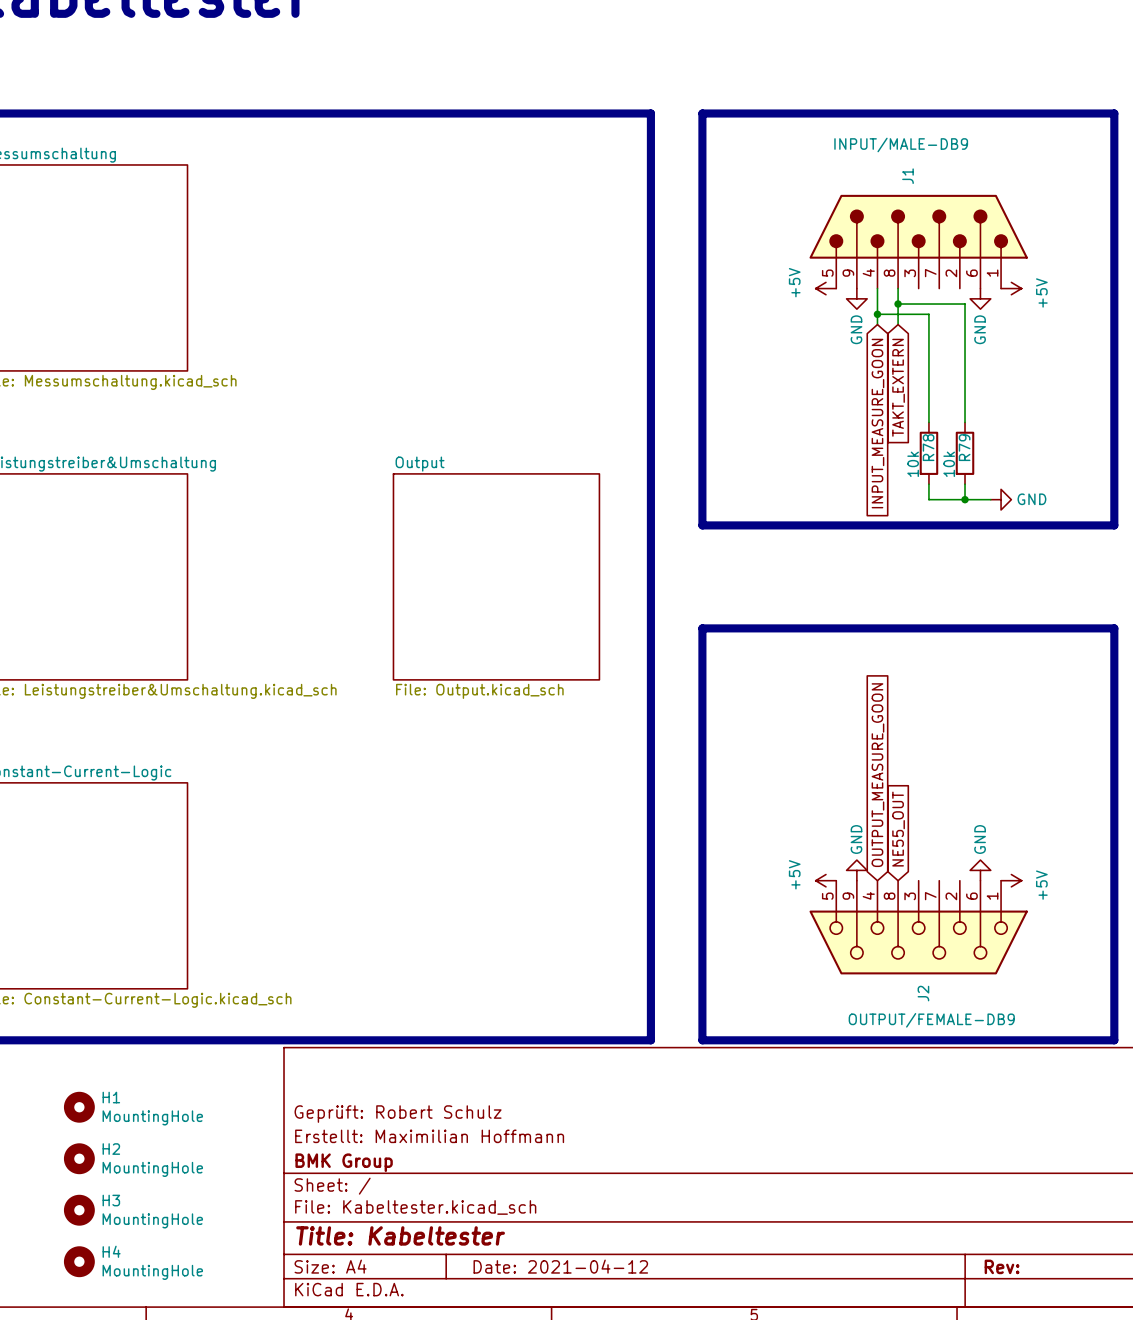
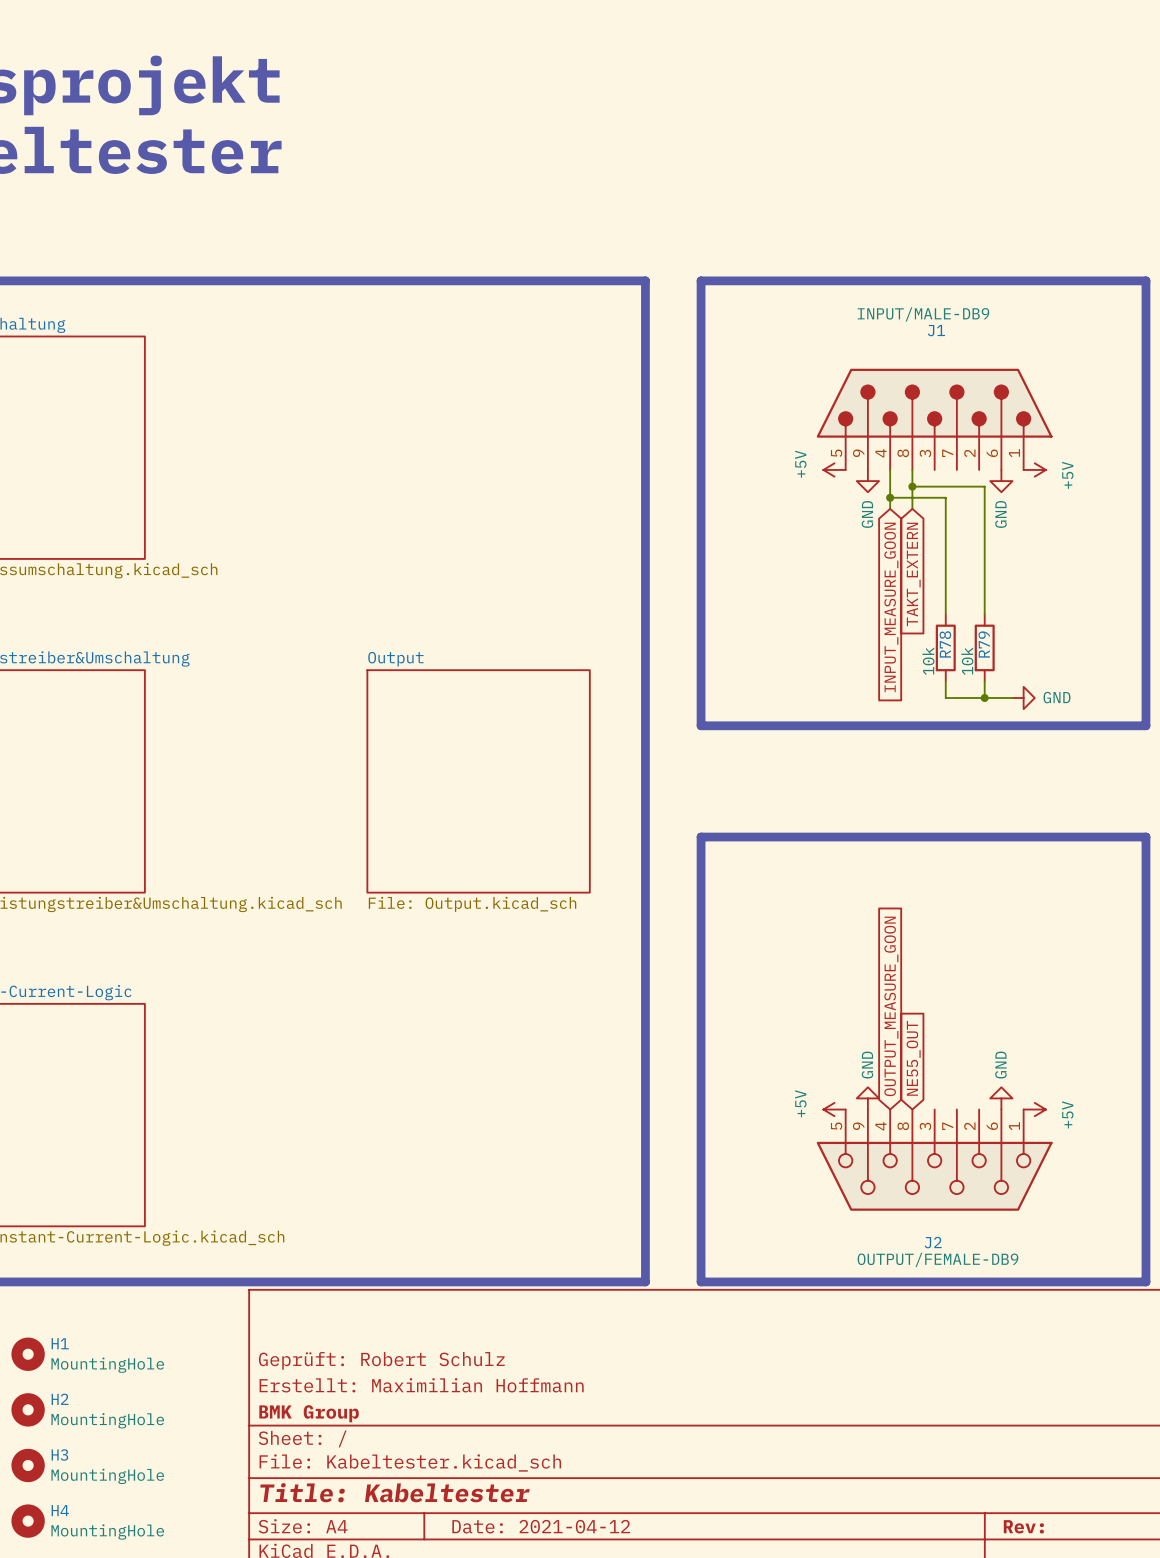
J1 name rotation: 0° (907, 176) -> 90° clockwise (936, 330)
J2 name rotation: 0° (923, 993) -> 90° clockwise (933, 1242)

